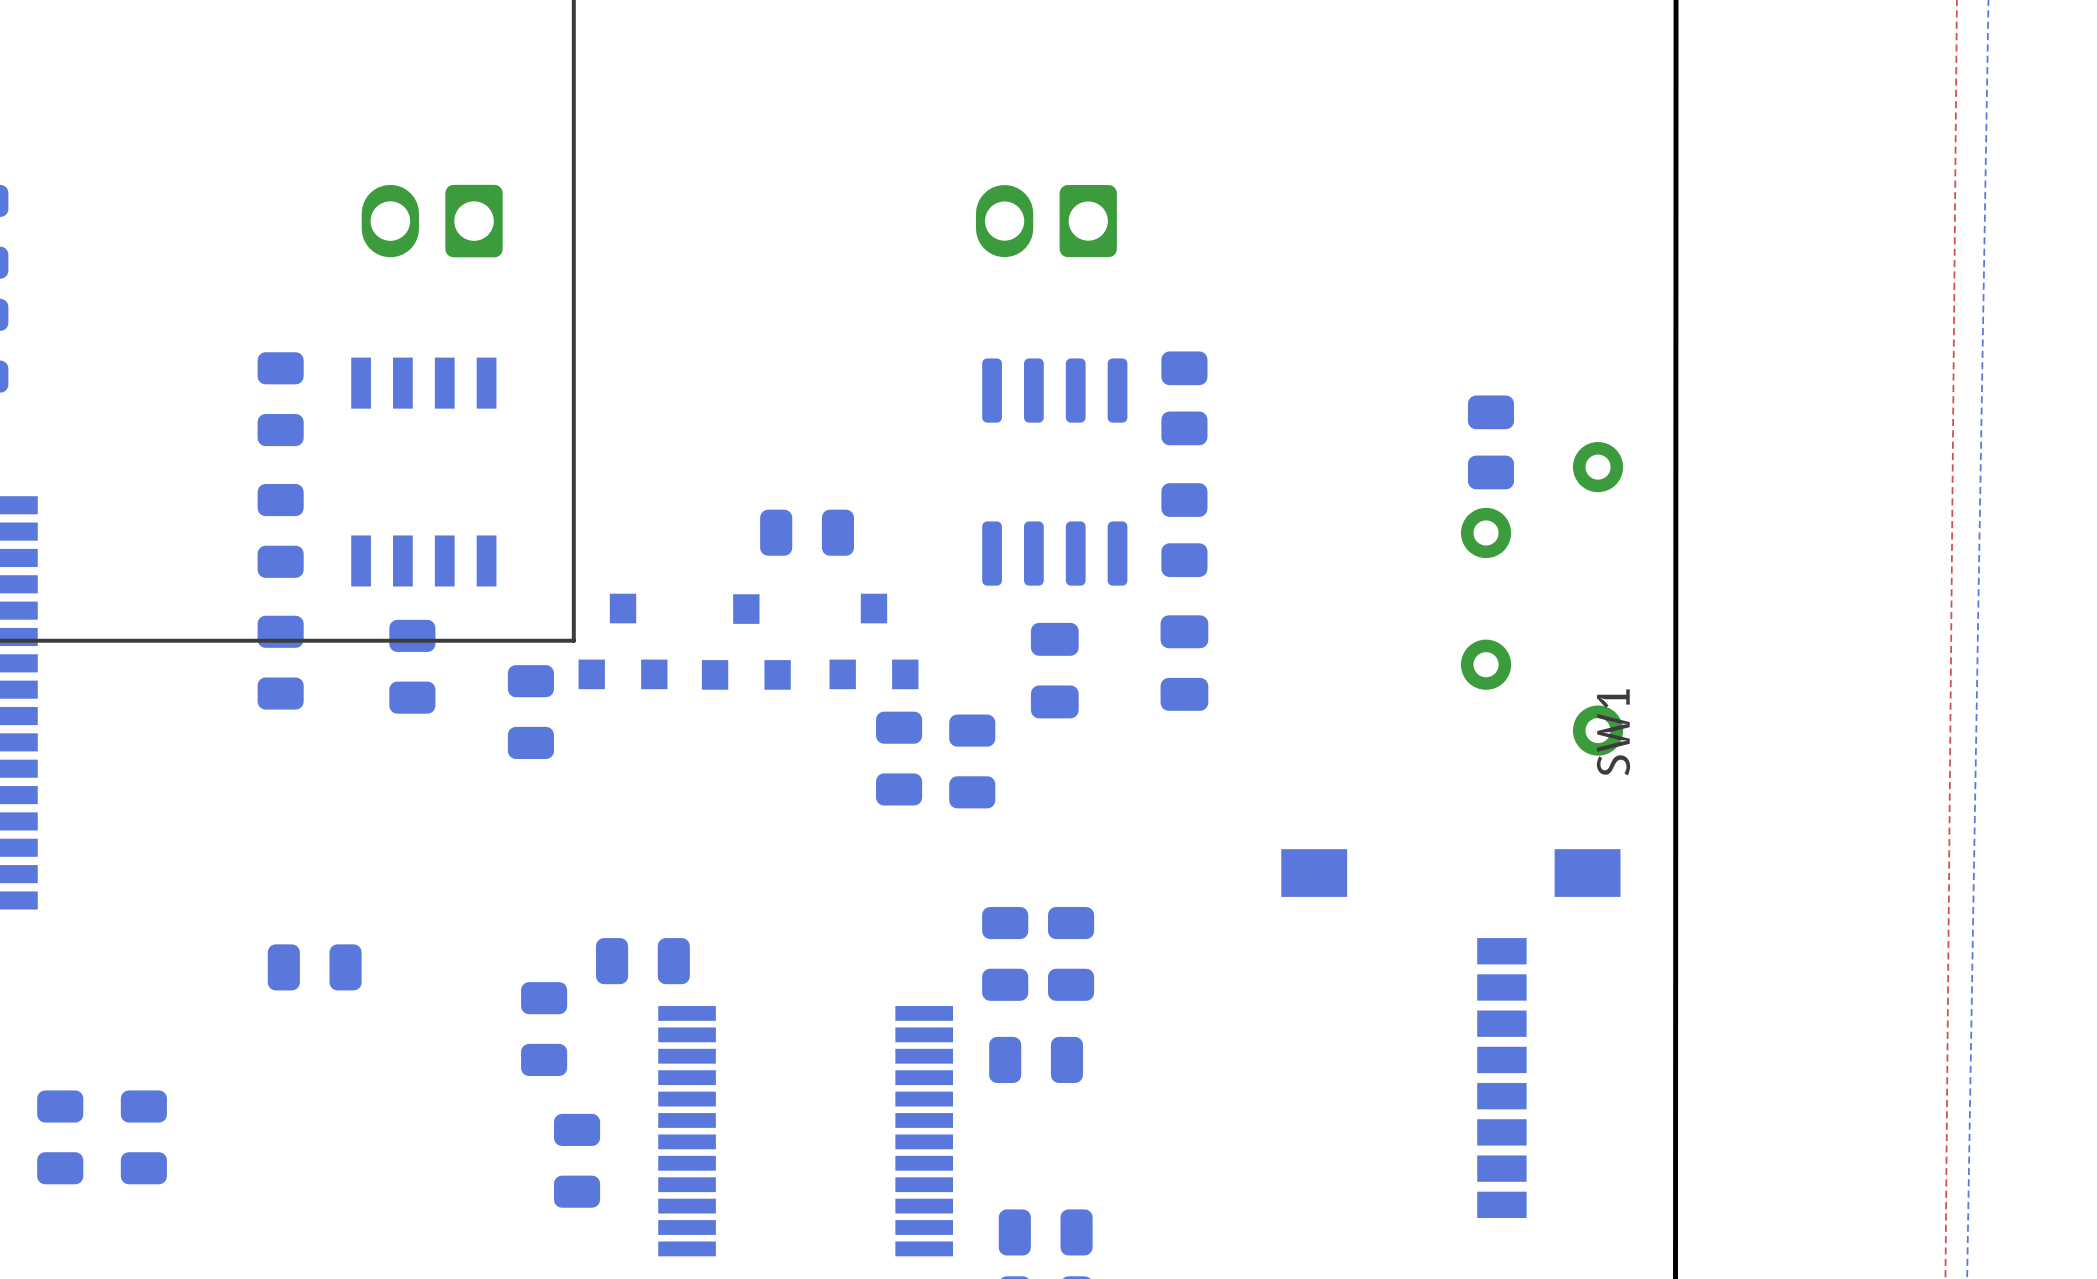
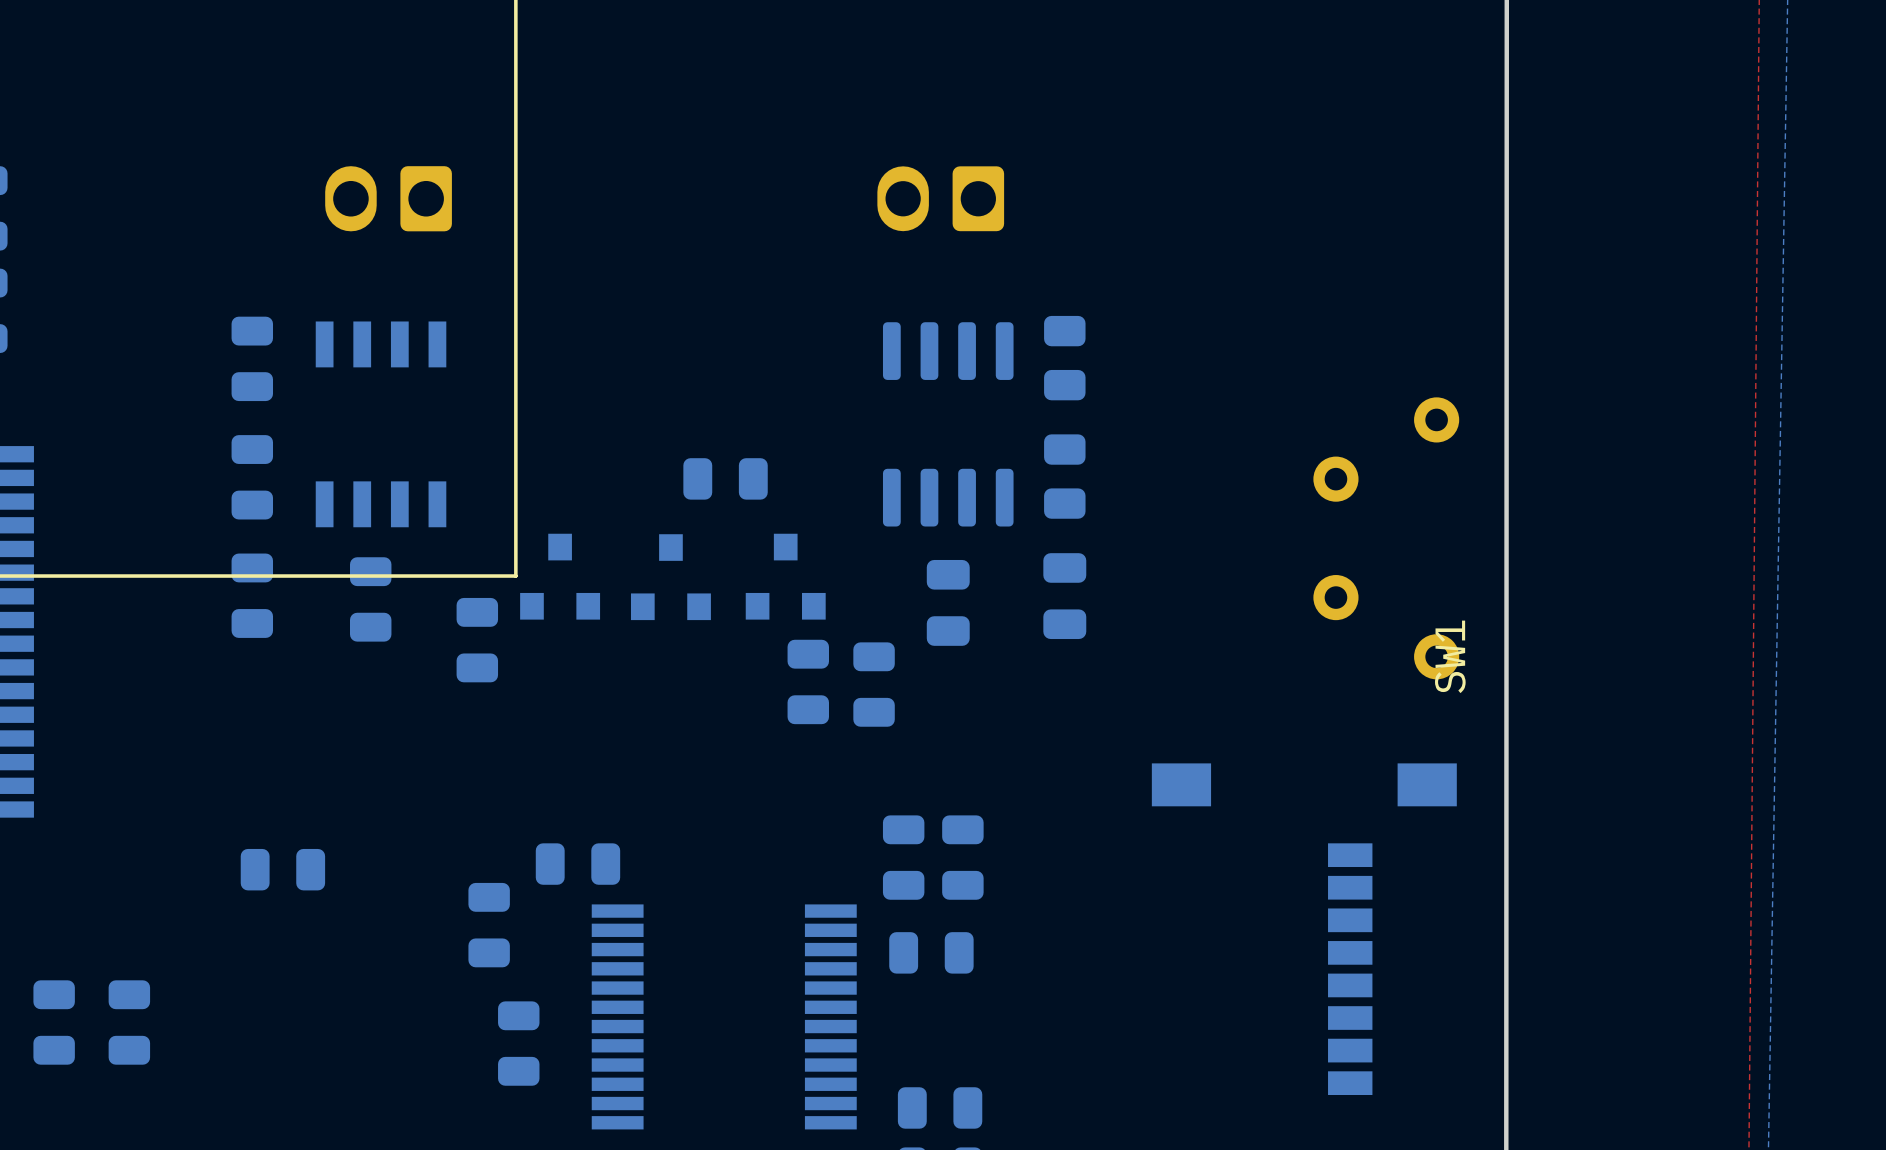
part: (1490, 442) -> none

